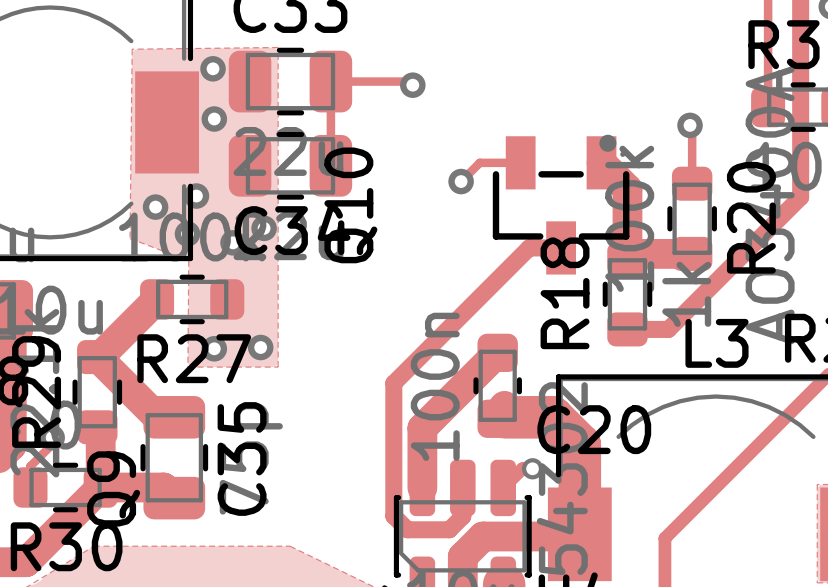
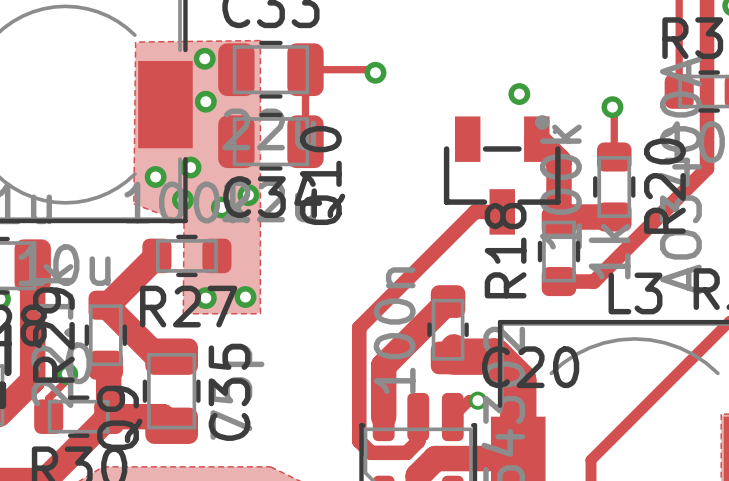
track: (520, 162) (479, 162) (461, 181) -> none
via position: (461, 181) -> (519, 94)

